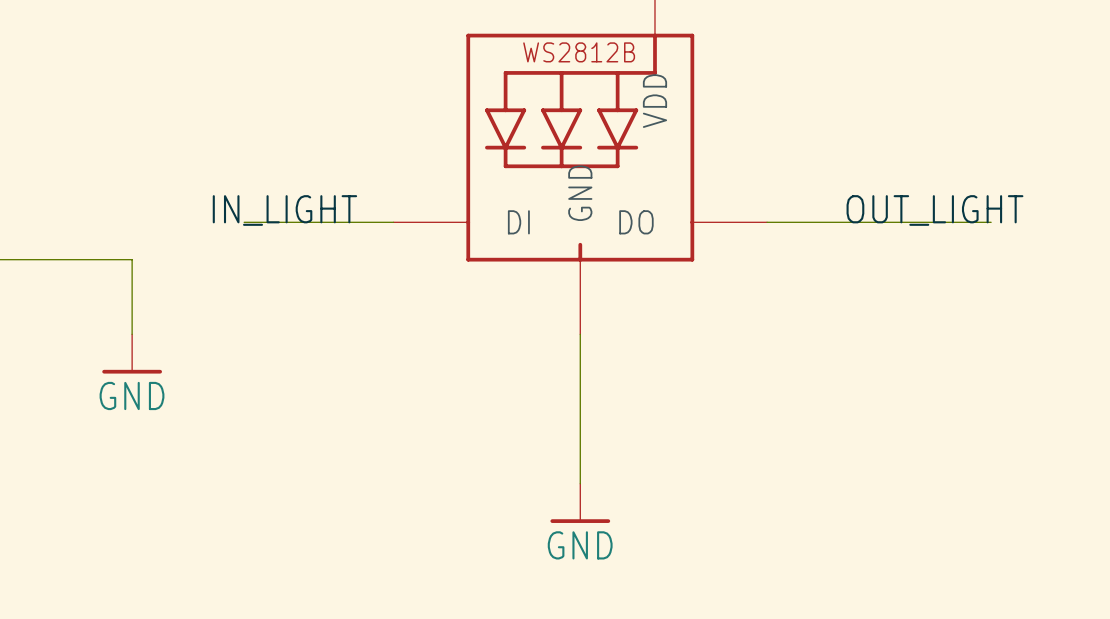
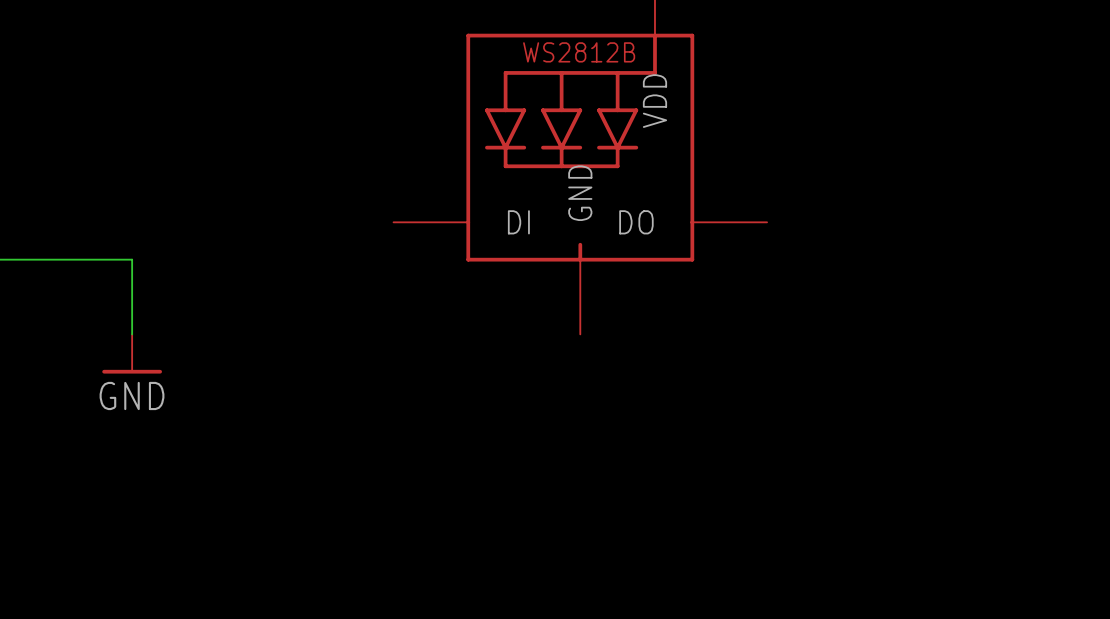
label: IN_LIGHT (284, 210) -> none
label: OUT_LIGHT (934, 210) -> none
wire: (244, 222) (393, 222) -> none
wire: (767, 222) (991, 222) -> none
wire: (580, 334) (580, 483) -> none
power symbol: GND (580, 503) -> none

